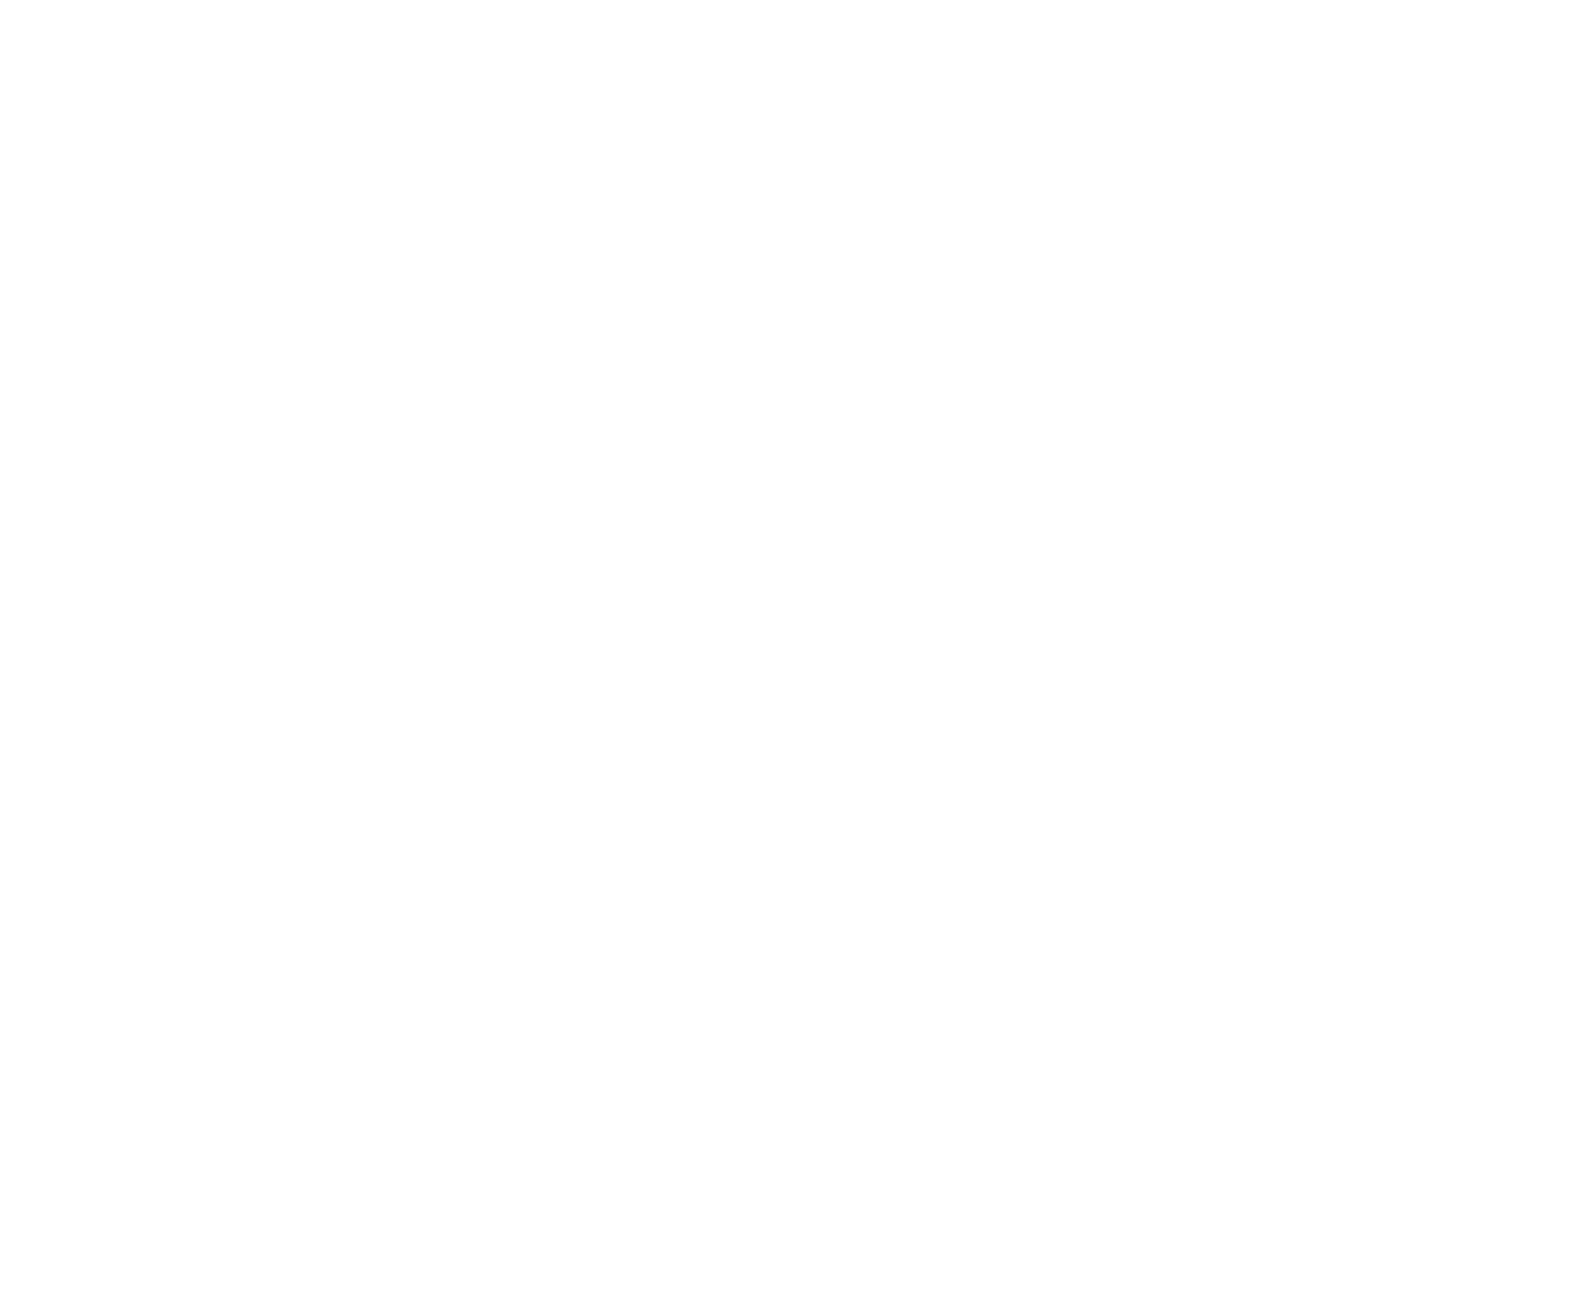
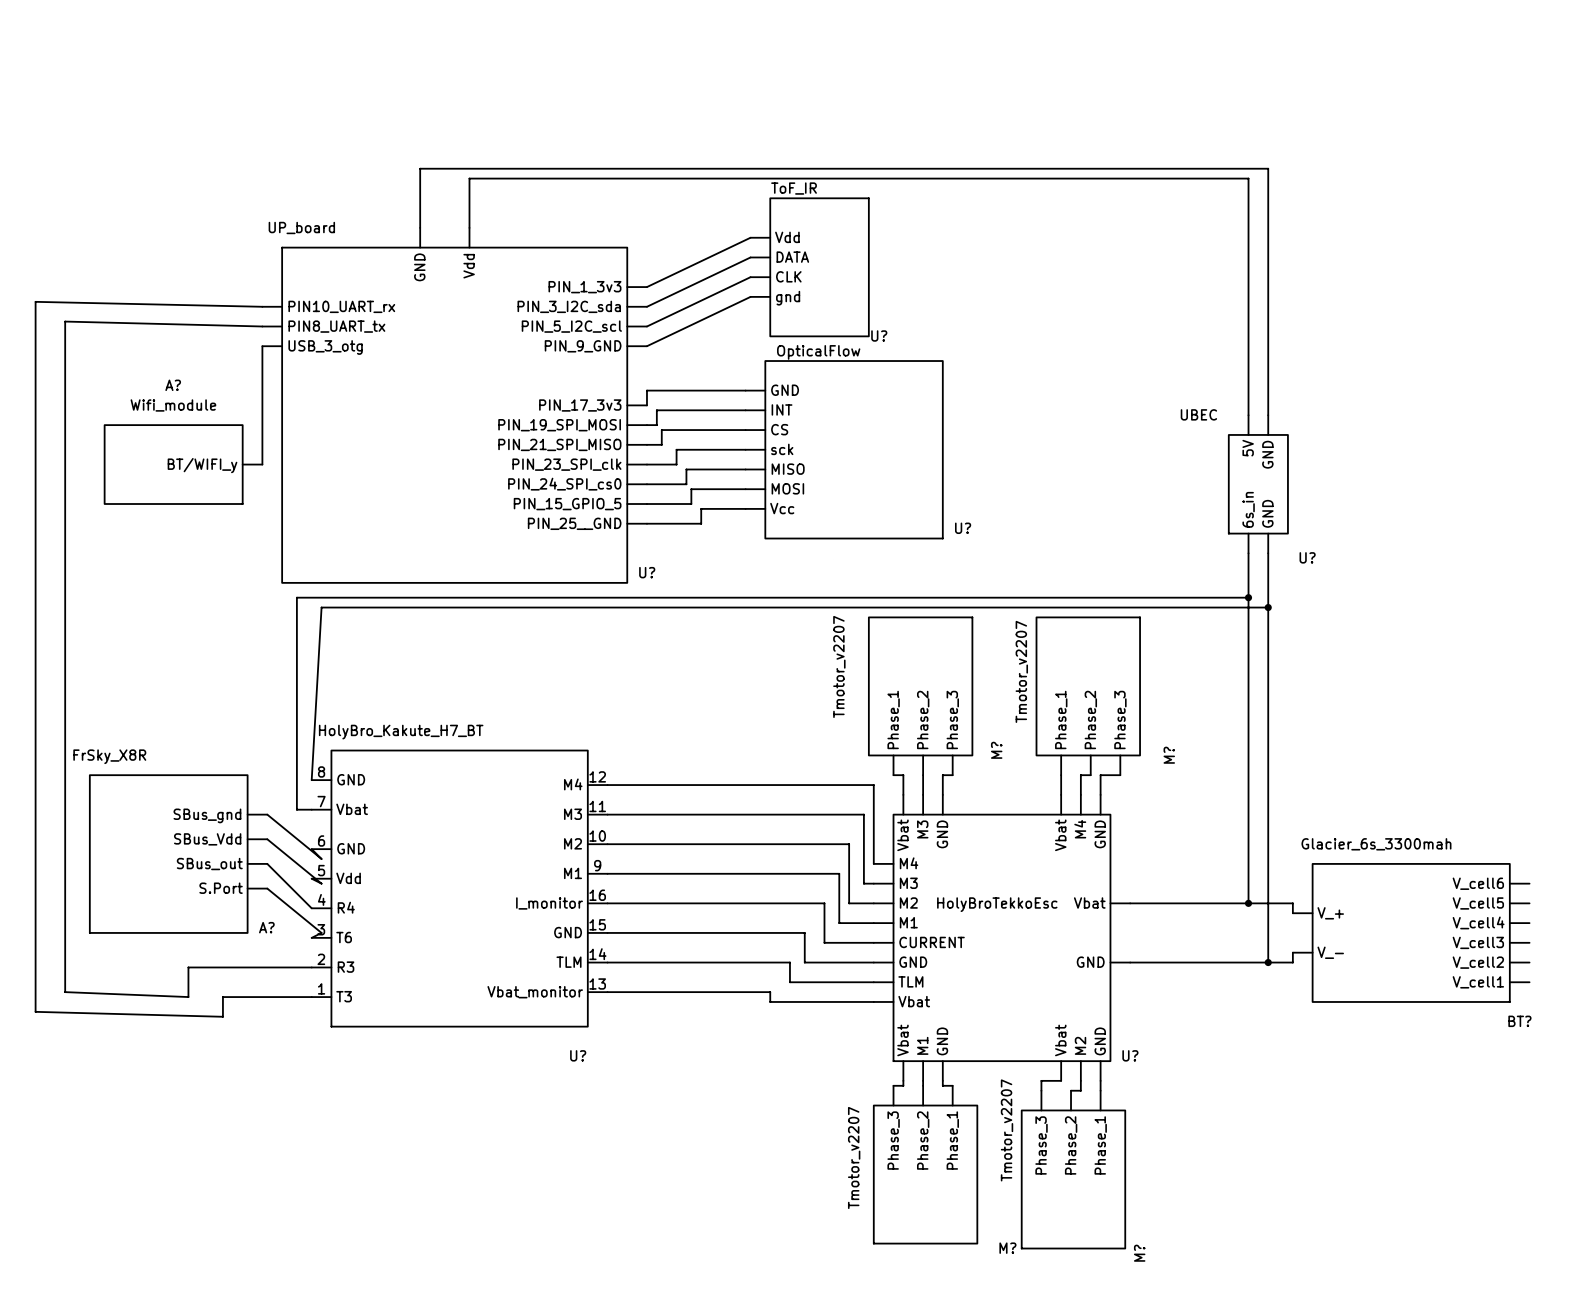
wire: none -> (420, 227) (420, 168) (1268, 168) (1268, 415)
wire: none -> (469, 227) (469, 178) (1248, 178) (1248, 415)
wire: none -> (750, 237) (646, 287)
wire: none -> (750, 257) (646, 306)
U?: none -> ToF_IR (809, 267)
wire: none -> (750, 277) (646, 326)
wire: none -> (750, 296) (646, 346)
wire: none -> (262, 306) (35, 301) (35, 1011) (222, 1016) (222, 997) (311, 997)
U?: none -> UP_board (733, 309)
wire: none -> (262, 326) (65, 321) (65, 992) (188, 997) (188, 967) (311, 967)
wire: none -> (262, 346) (262, 464)
wire: none -> (745, 390) (646, 390) (646, 405)
wire: none -> (745, 410) (656, 410) (656, 425) (646, 425)
U?: none -> UBEC (1226, 427)
wire: none -> (745, 430) (661, 430) (661, 444) (646, 444)
wire: none -> (745, 449) (676, 449) (676, 464) (646, 464)
U?: none -> OpticalFlow (844, 449)
A?: none -> Wifi_module (183, 464)
wire: none -> (745, 469) (686, 469) (686, 484) (646, 484)
wire: none -> (745, 489) (691, 489) (691, 504) (646, 504)
wire: none -> (745, 508) (701, 508) (701, 523) (646, 523)
wire: none -> (1248, 553) (1248, 903)
wire: none -> (1268, 553) (1268, 962)
wire: none -> (1248, 597) (296, 597) (296, 809) (311, 809)
junction: none -> (1248, 597)
wire: none -> (1268, 607) (321, 607) (311, 780)
junction: none -> (1268, 607)
A?: none -> FrSky_X8R (171, 738)
wire: none -> (893, 775) (903, 775) (903, 794)
wire: none -> (923, 775) (923, 794)
wire: none -> (952, 775) (942, 775) (942, 794)
wire: none -> (1061, 775) (1061, 794)
wire: none -> (1090, 775) (1080, 775) (1080, 794)
wire: none -> (1120, 775) (1100, 775) (1100, 794)
wire: none -> (607, 785) (873, 785) (873, 863)
U?: none -> HolyBroTekkoEsc (972, 809)
wire: none -> (267, 814) (321, 859) (311, 849)
wire: none -> (607, 814) (863, 814) (863, 883) (873, 883)
wire: none -> (267, 839) (321, 883) (311, 878)
wire: none -> (607, 844) (849, 844) (849, 903) (873, 903)
wire: none -> (267, 863) (311, 908)
wire: none -> (607, 873) (839, 873) (839, 923) (873, 923)
M?: none -> Tmotor_v2207 (1019, 883)
M?: none -> Tmotor_v2207 (1186, 883)
wire: none -> (267, 888) (321, 932) (311, 937)
wire: none -> (607, 903) (824, 903) (824, 942) (873, 942)
wire: none -> (1130, 903) (1292, 903) (1292, 913)
junction: none -> (1248, 903)
wire: none -> (607, 932) (804, 932) (804, 962) (873, 962)
U?: none -> HolyBro_Kakute_H7_BT (661, 932)
wire: none -> (1292, 952) (1292, 962) (1130, 962)
wire: none -> (607, 962) (789, 962) (789, 982) (873, 982)
junction: none -> (1268, 962)
M?: none -> Tmotor_v2207 (826, 977)
M?: none -> Tmotor_v2207 (974, 982)
wire: none -> (607, 992) (770, 992) (770, 1001) (873, 1001)
BT?: none -> Glacier_6s_3300mah (1260, 1009)
wire: none -> (903, 1080) (903, 1085) (893, 1085)
wire: none -> (923, 1080) (923, 1085)
wire: none -> (942, 1080) (942, 1085) (952, 1085)
wire: none -> (1061, 1080) (1041, 1080) (1041, 1090)
wire: none -> (1080, 1080) (1080, 1090) (1071, 1090)
wire: none -> (1100, 1080) (1100, 1090)

